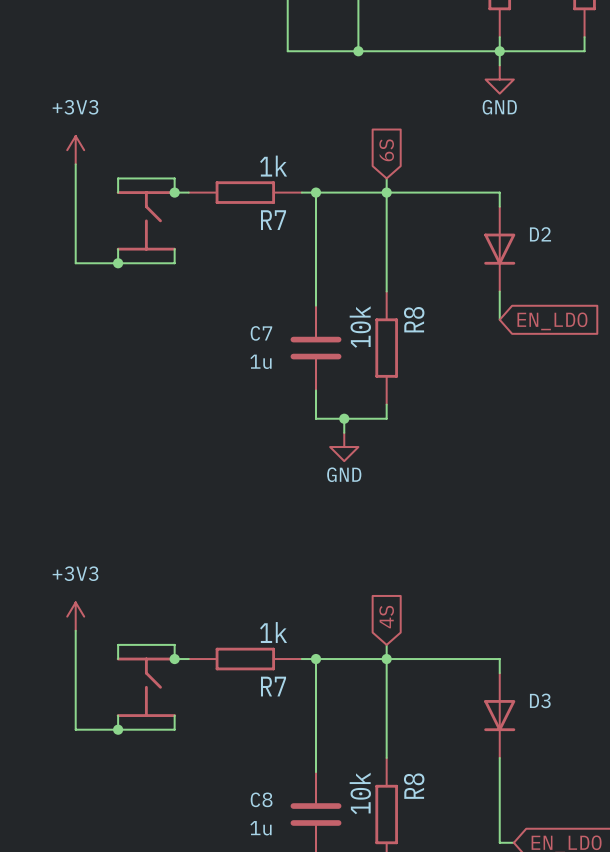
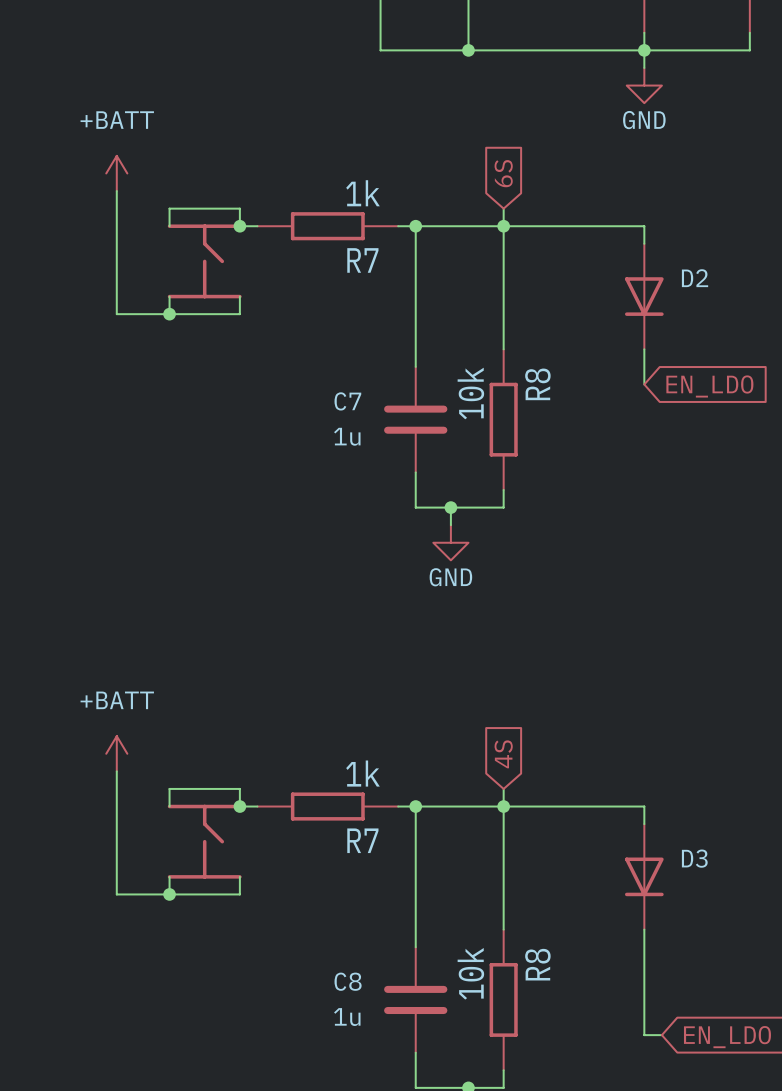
power symbol: +3V3 (75, 150) -> +BATT (116, 173)
power symbol: +3V3 (75, 616) -> +BATT (116, 753)

